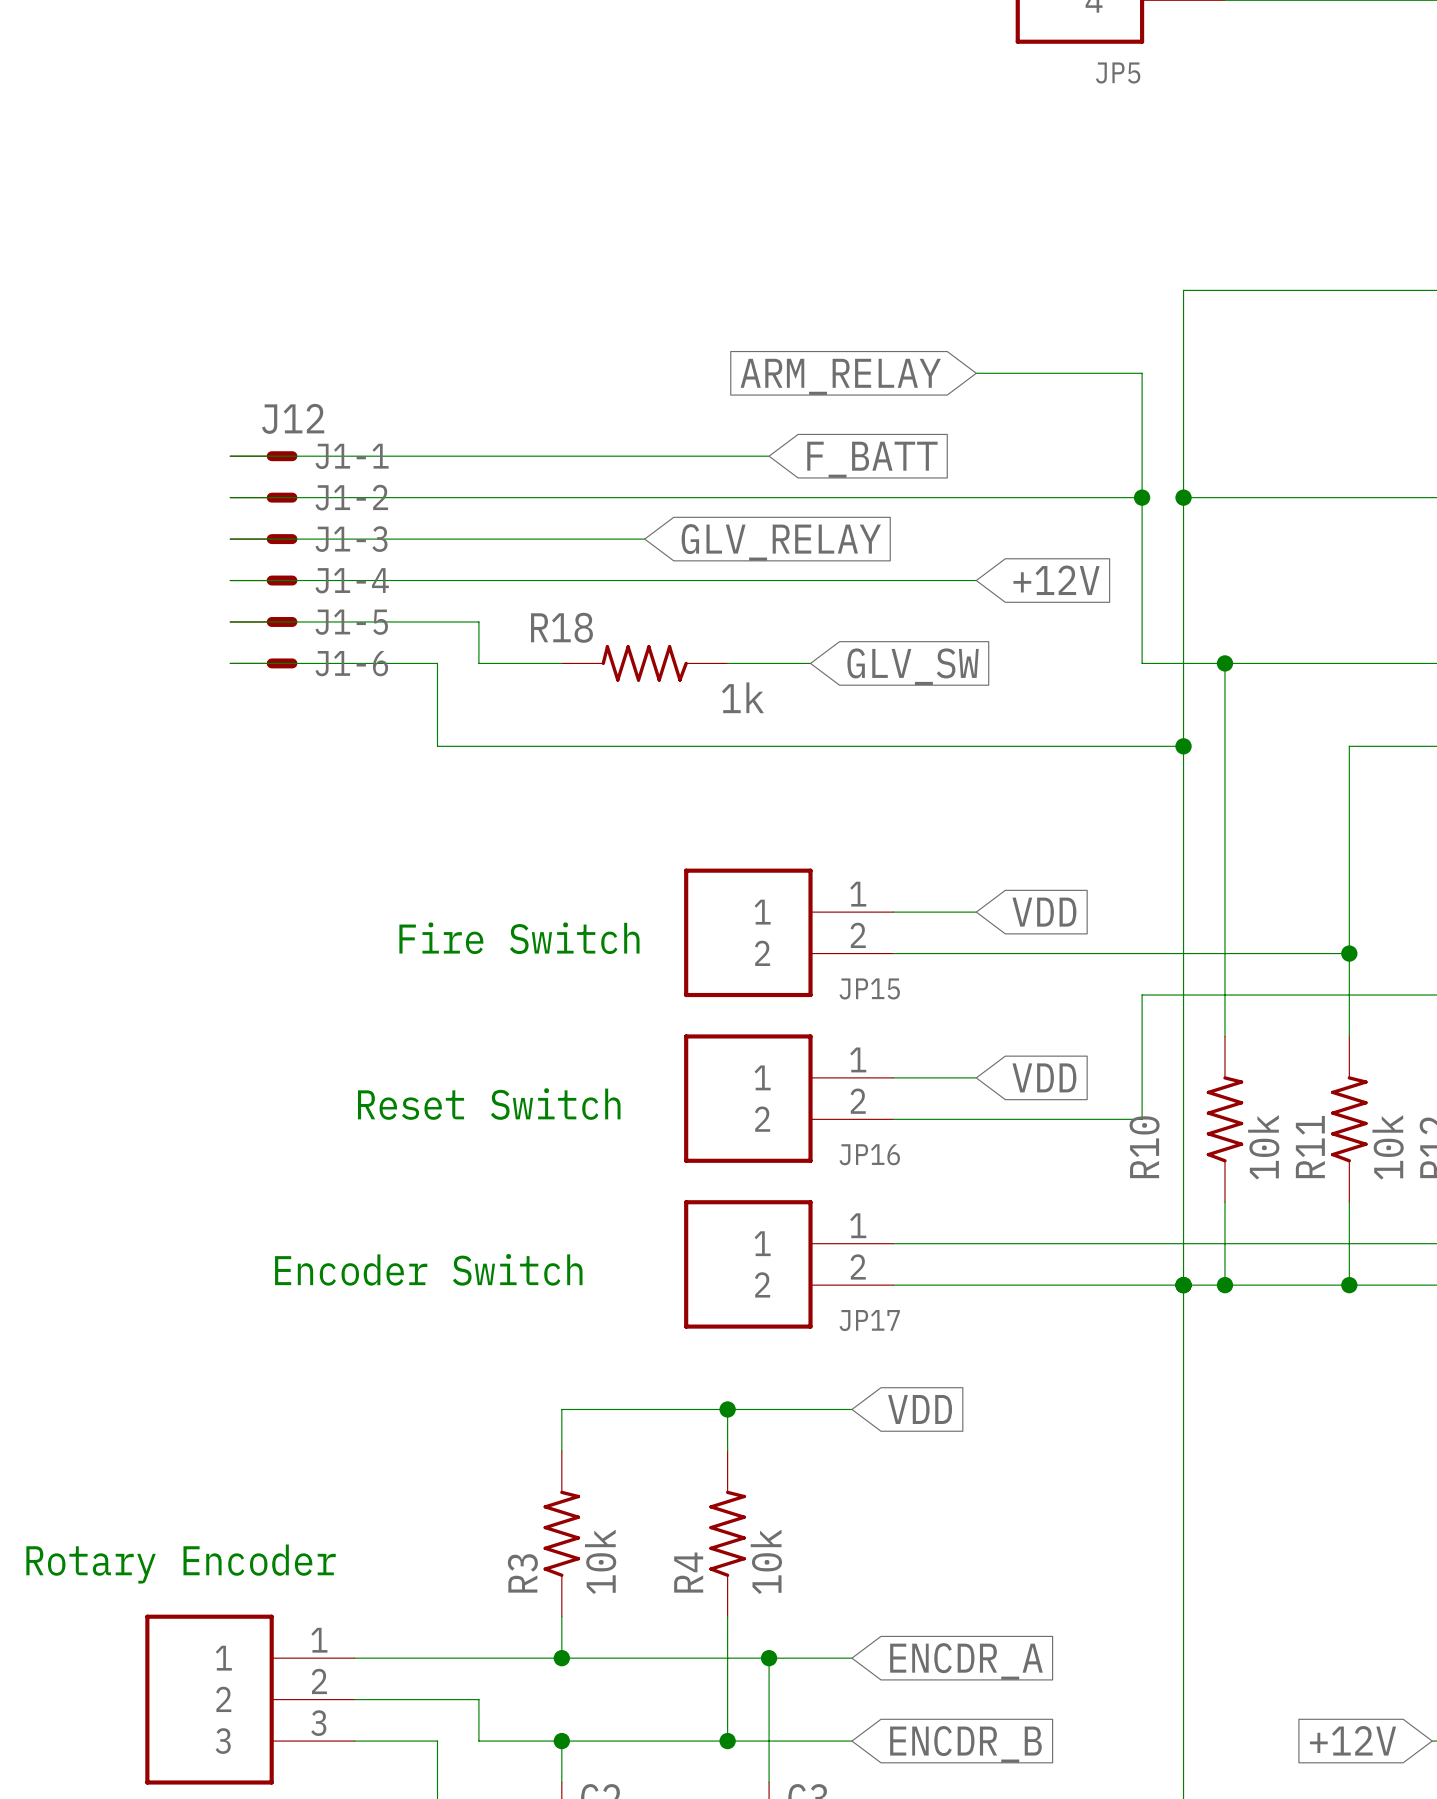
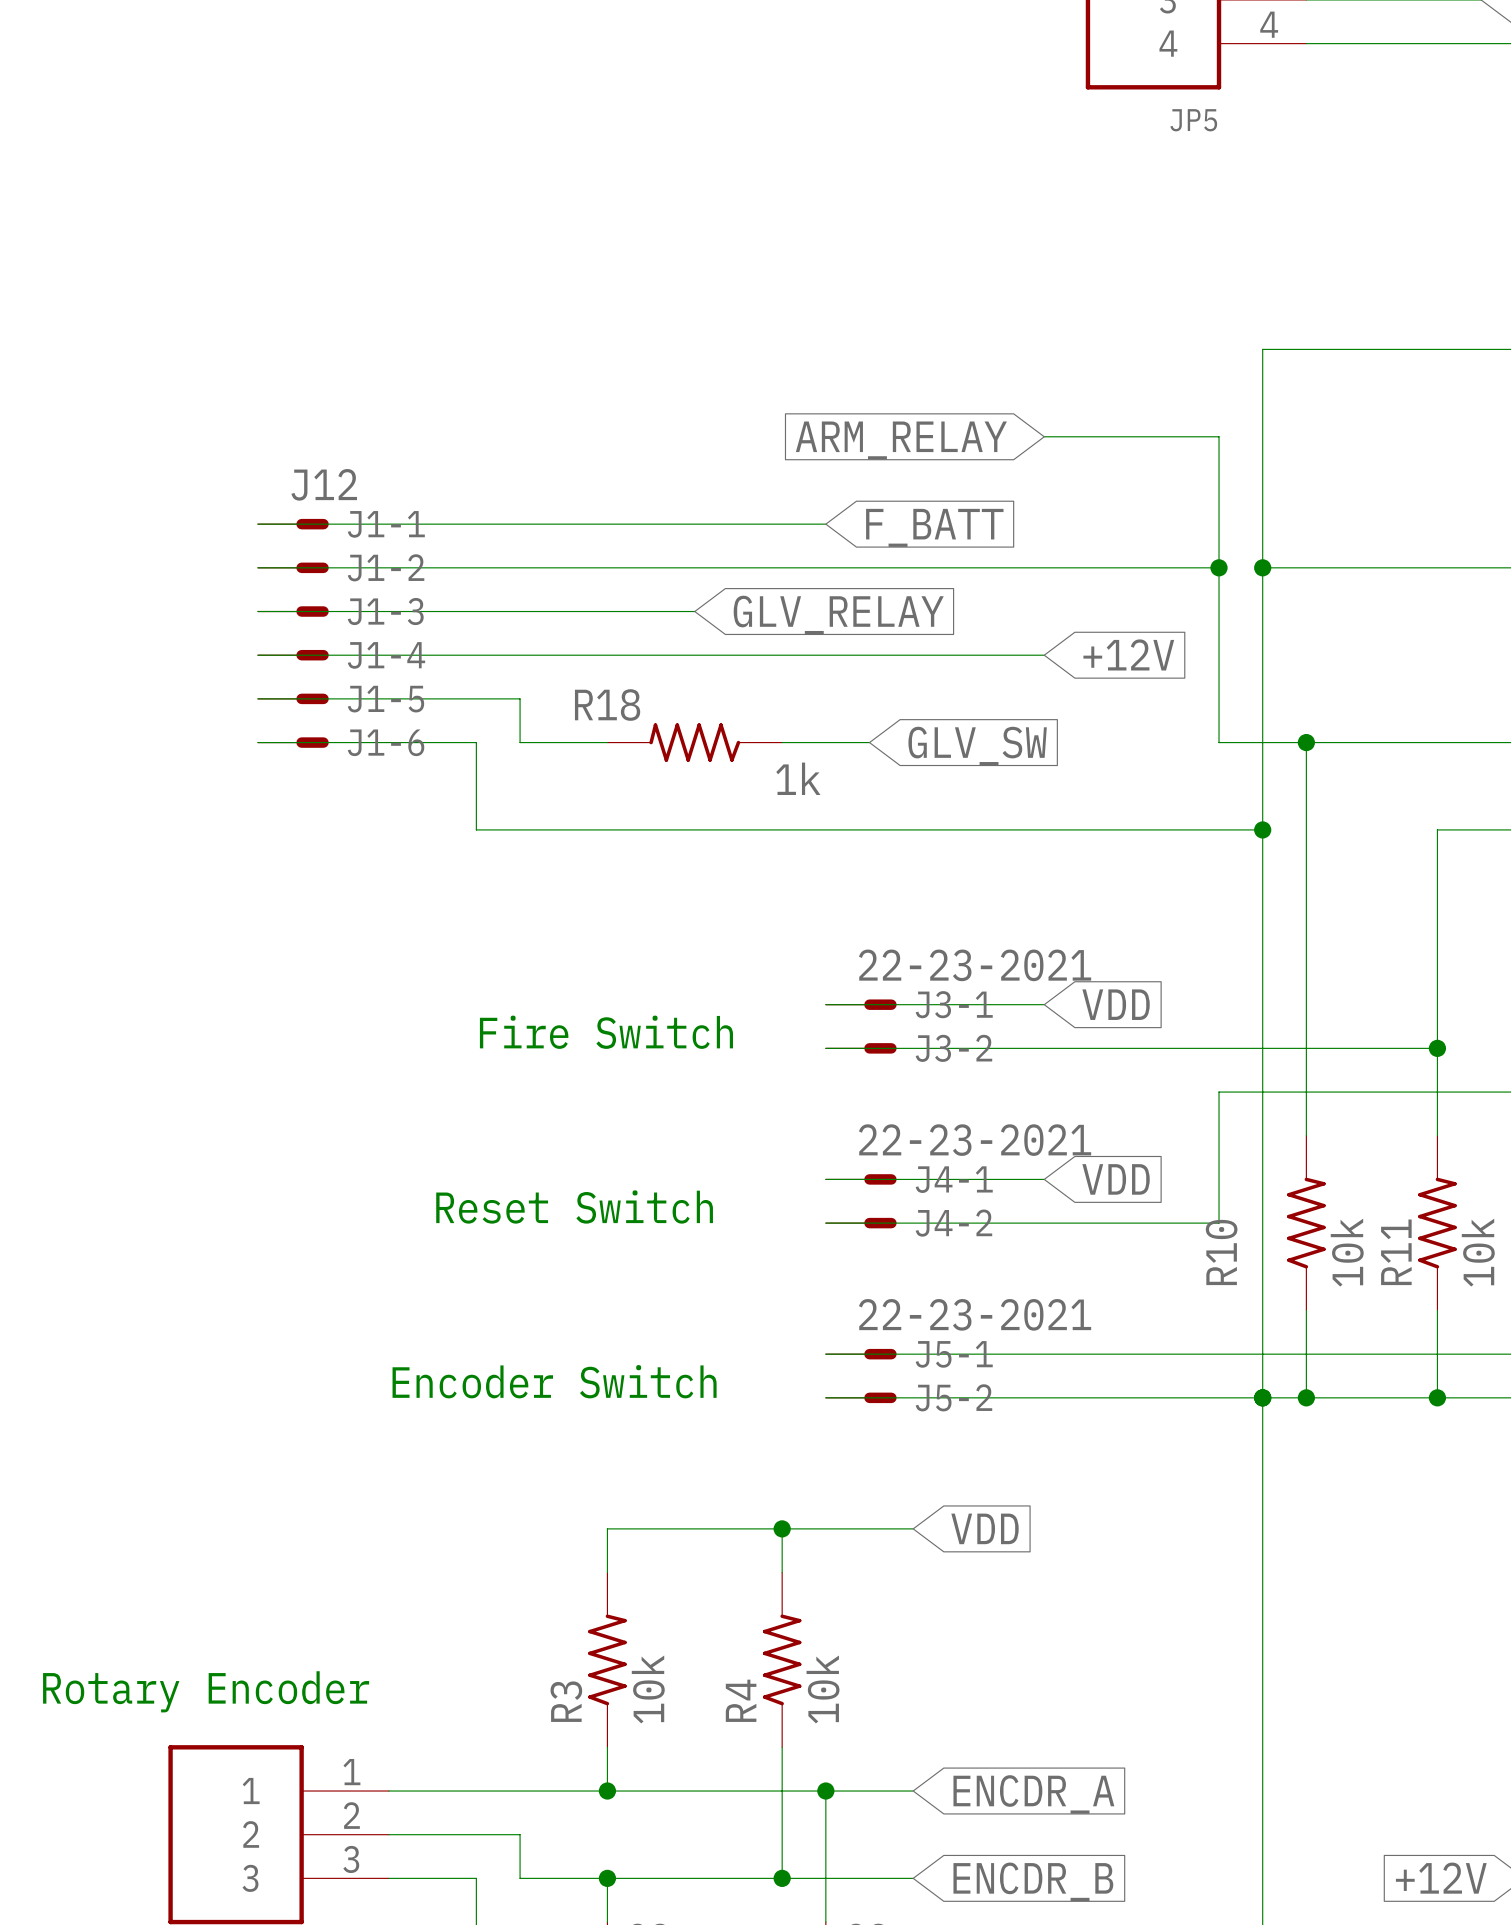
J3-1: none -> 22-23-2021 (861, 1004)
JP15: (788, 932) -> none
text position: Fire Switch (519, 938) -> Fire Switch (606, 1032)
J3-2: none -> (861, 1048)
J4-1: none -> 22-23-2021 (861, 1179)
JP16: (788, 1098) -> none
text position: Reset Switch (489, 1104) -> Reset Switch (574, 1206)
J4-2: none -> (861, 1223)
J5-1: none -> 22-23-2021 (861, 1354)
JP17: (788, 1264) -> none
text position: Encoder Switch (428, 1269) -> Encoder Switch (554, 1381)
J5-2: none -> (861, 1397)

